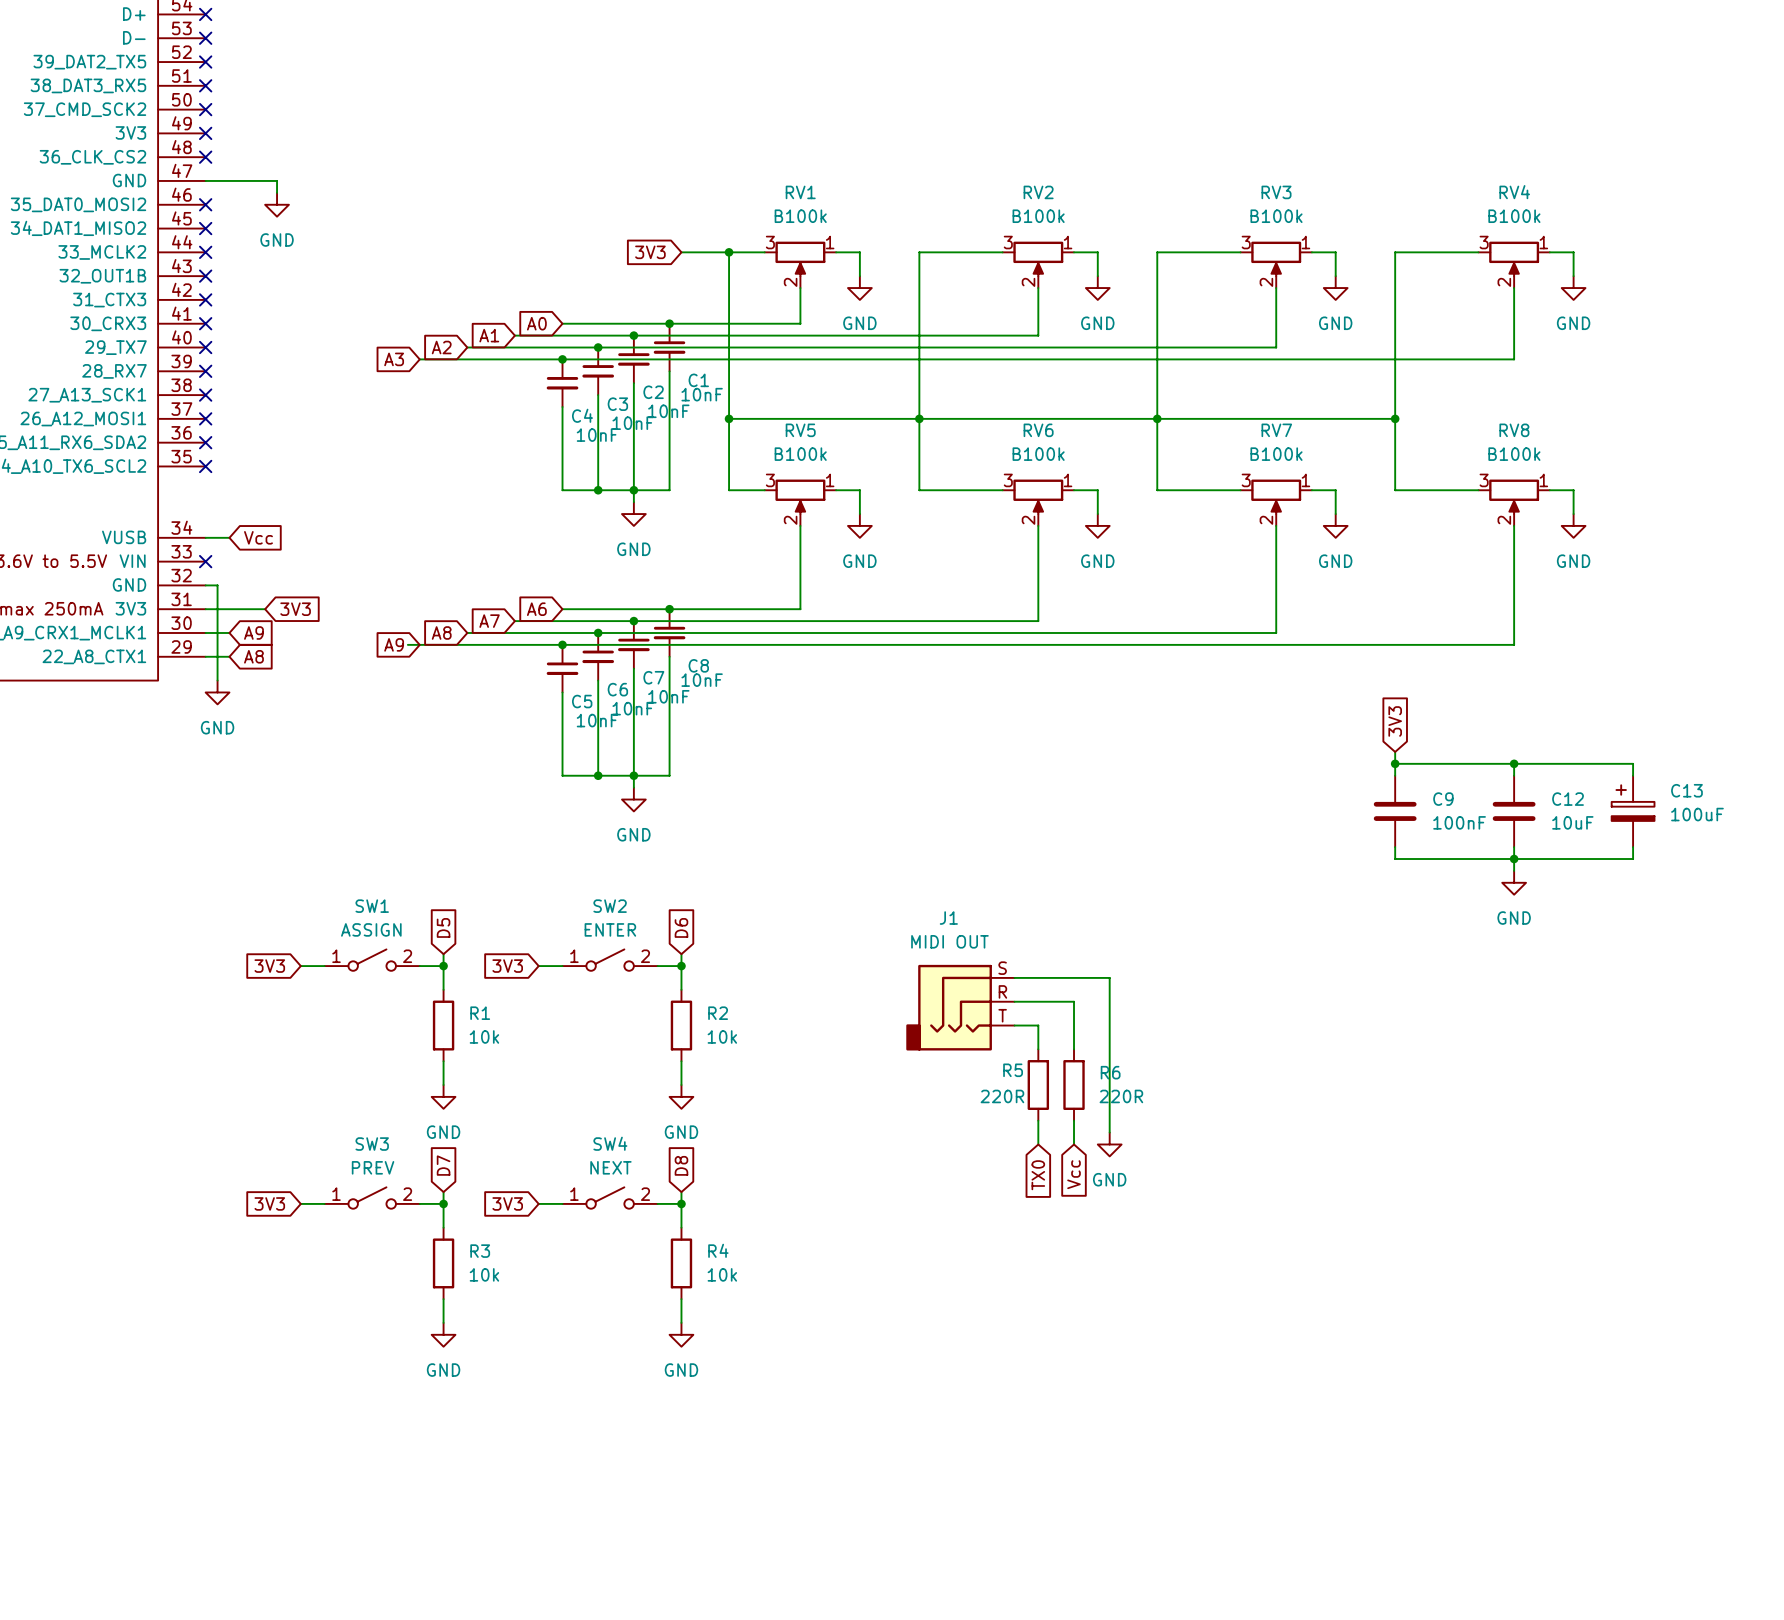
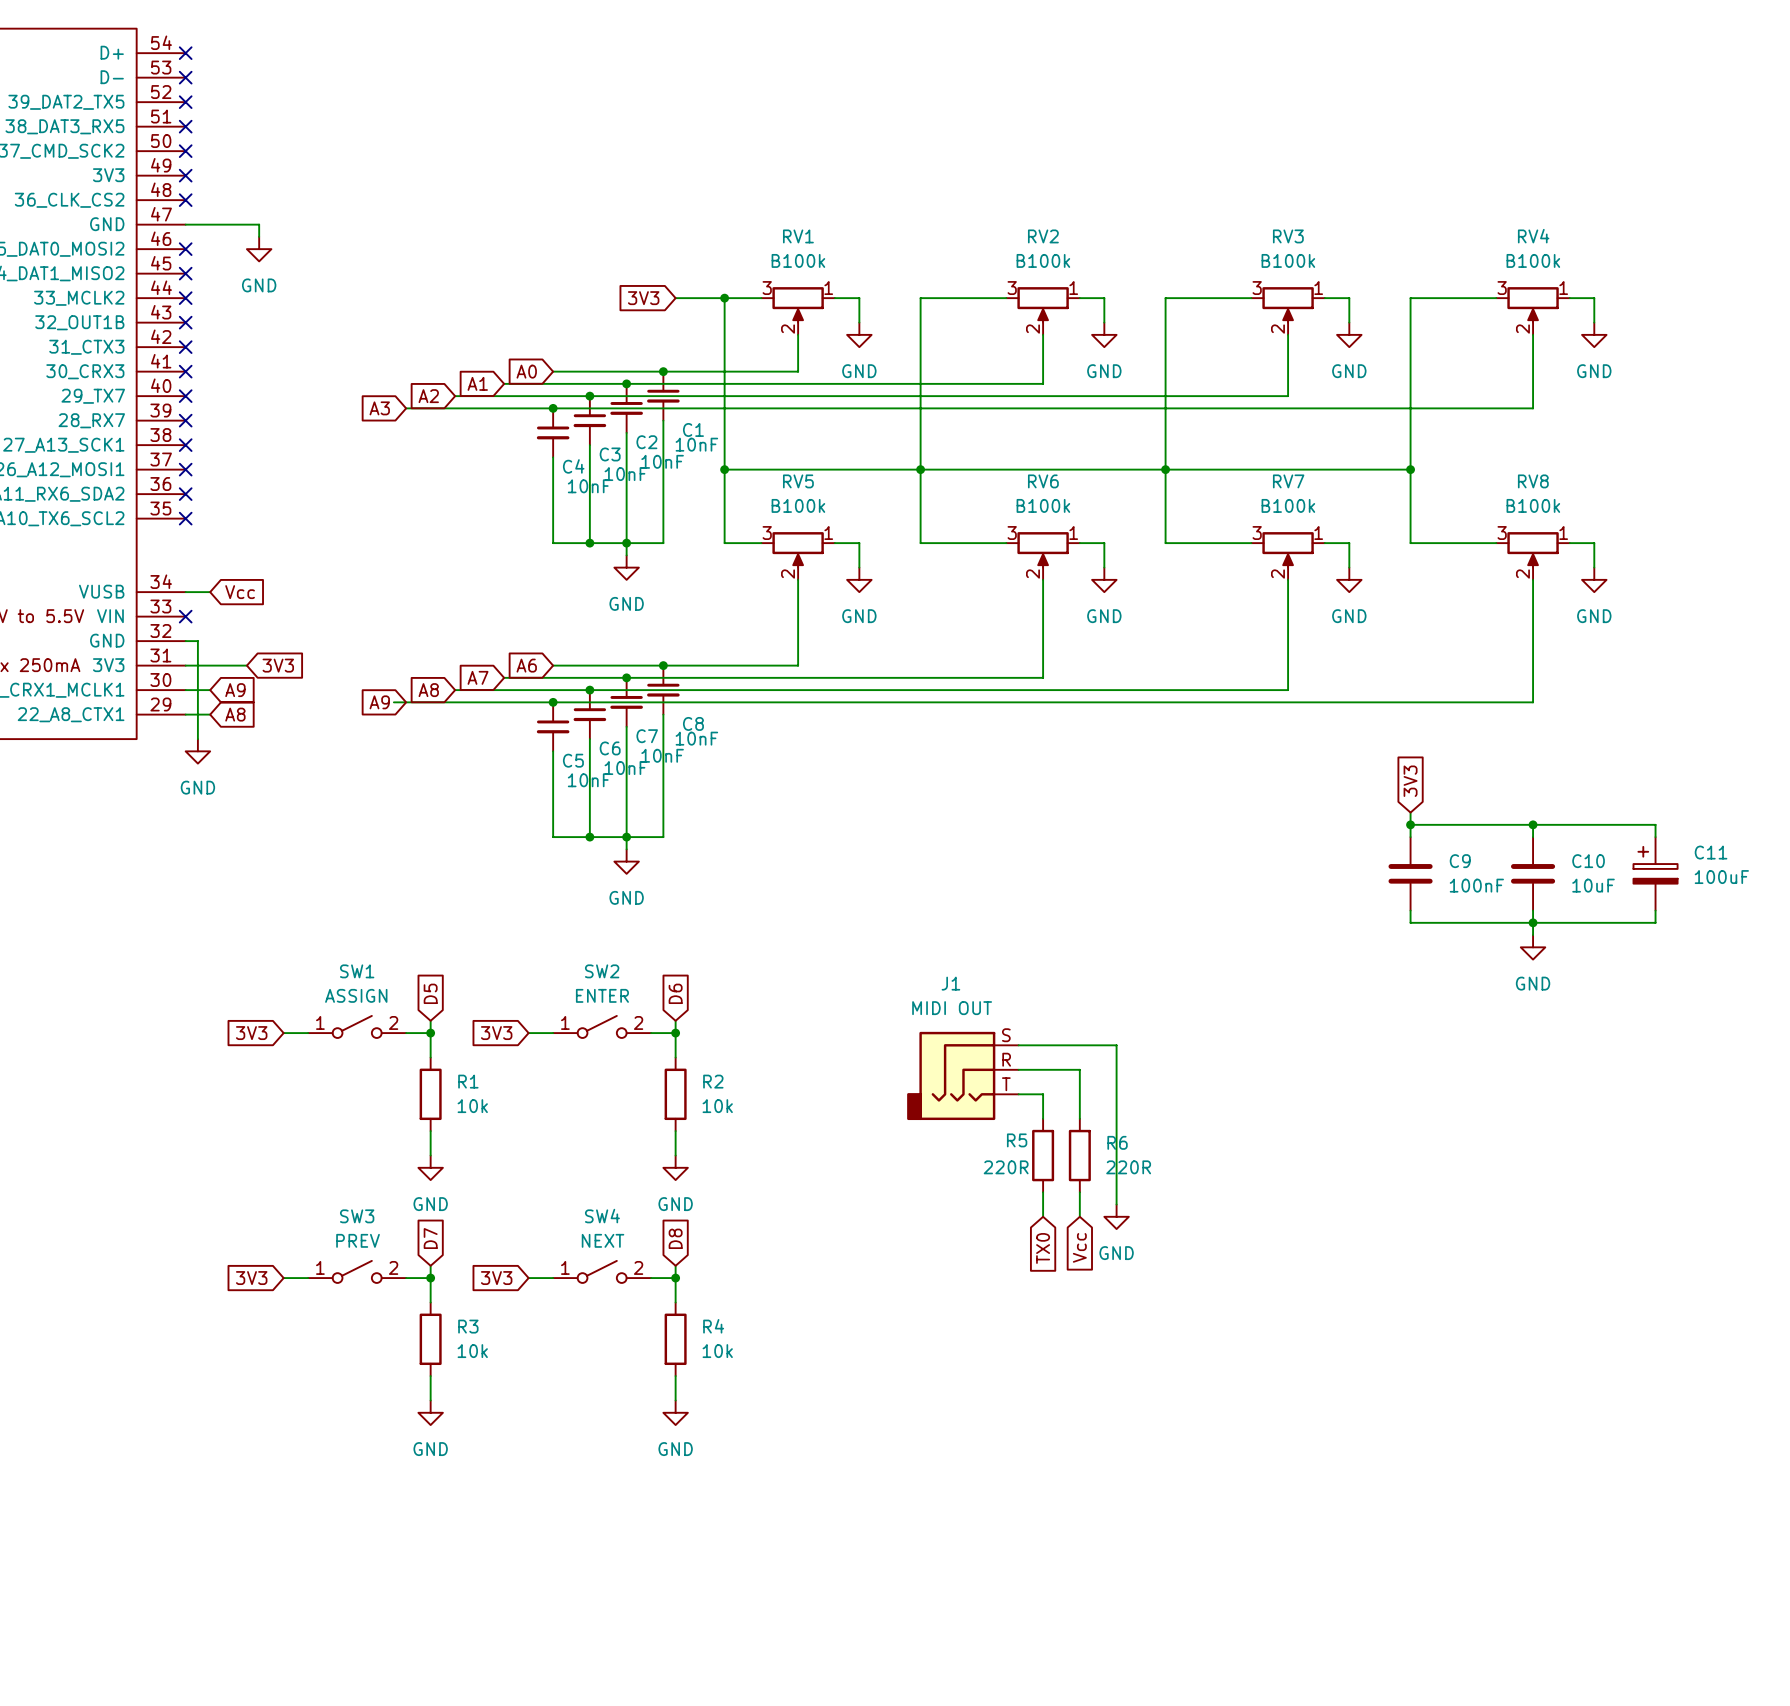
C13 name: C13 (1686, 790) -> C11 (1711, 852)
C12 name: C12 (1568, 799) -> C10 (1588, 861)

